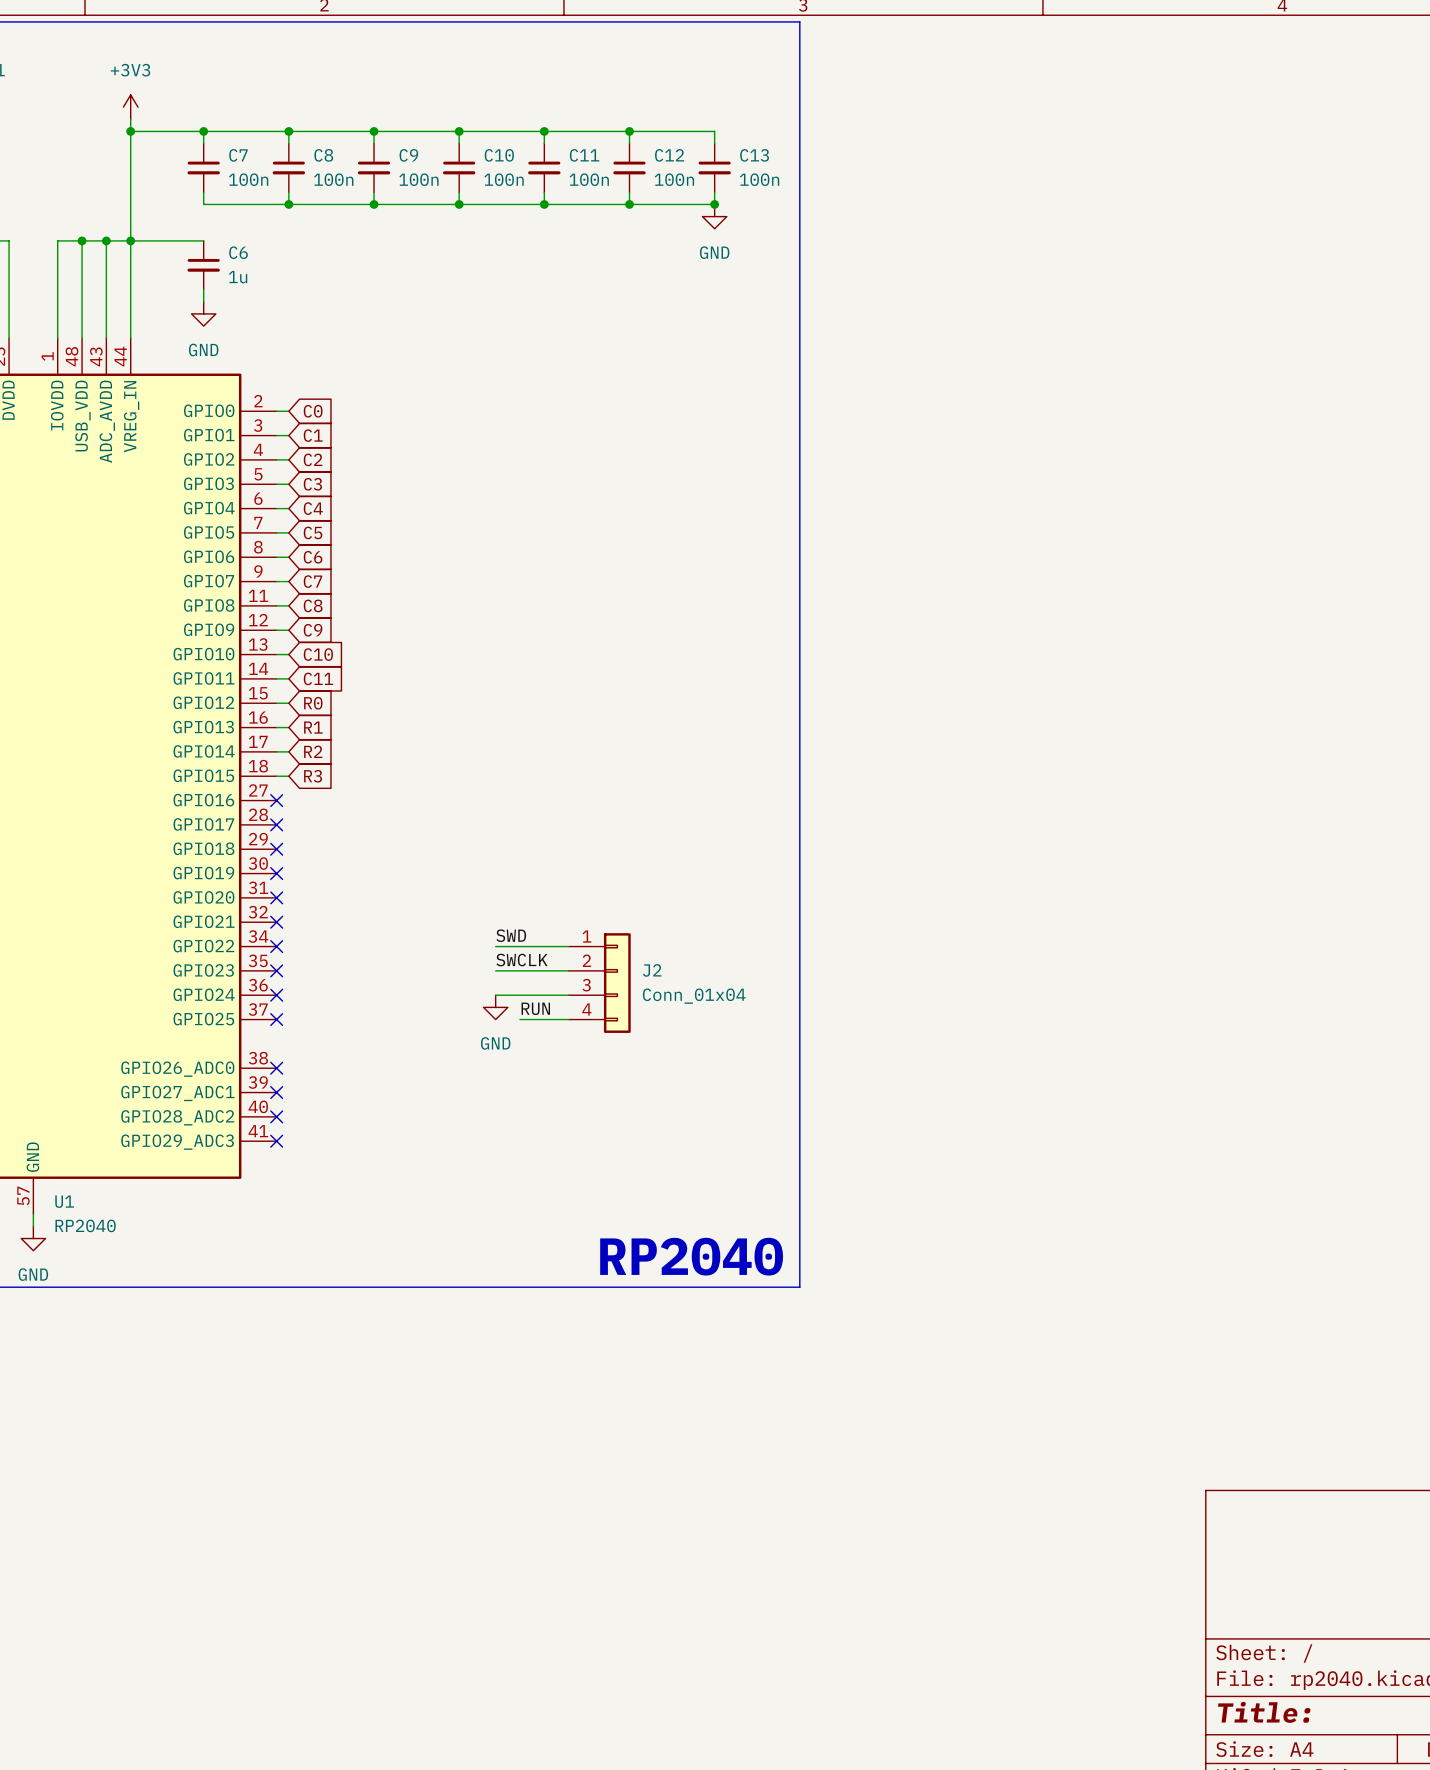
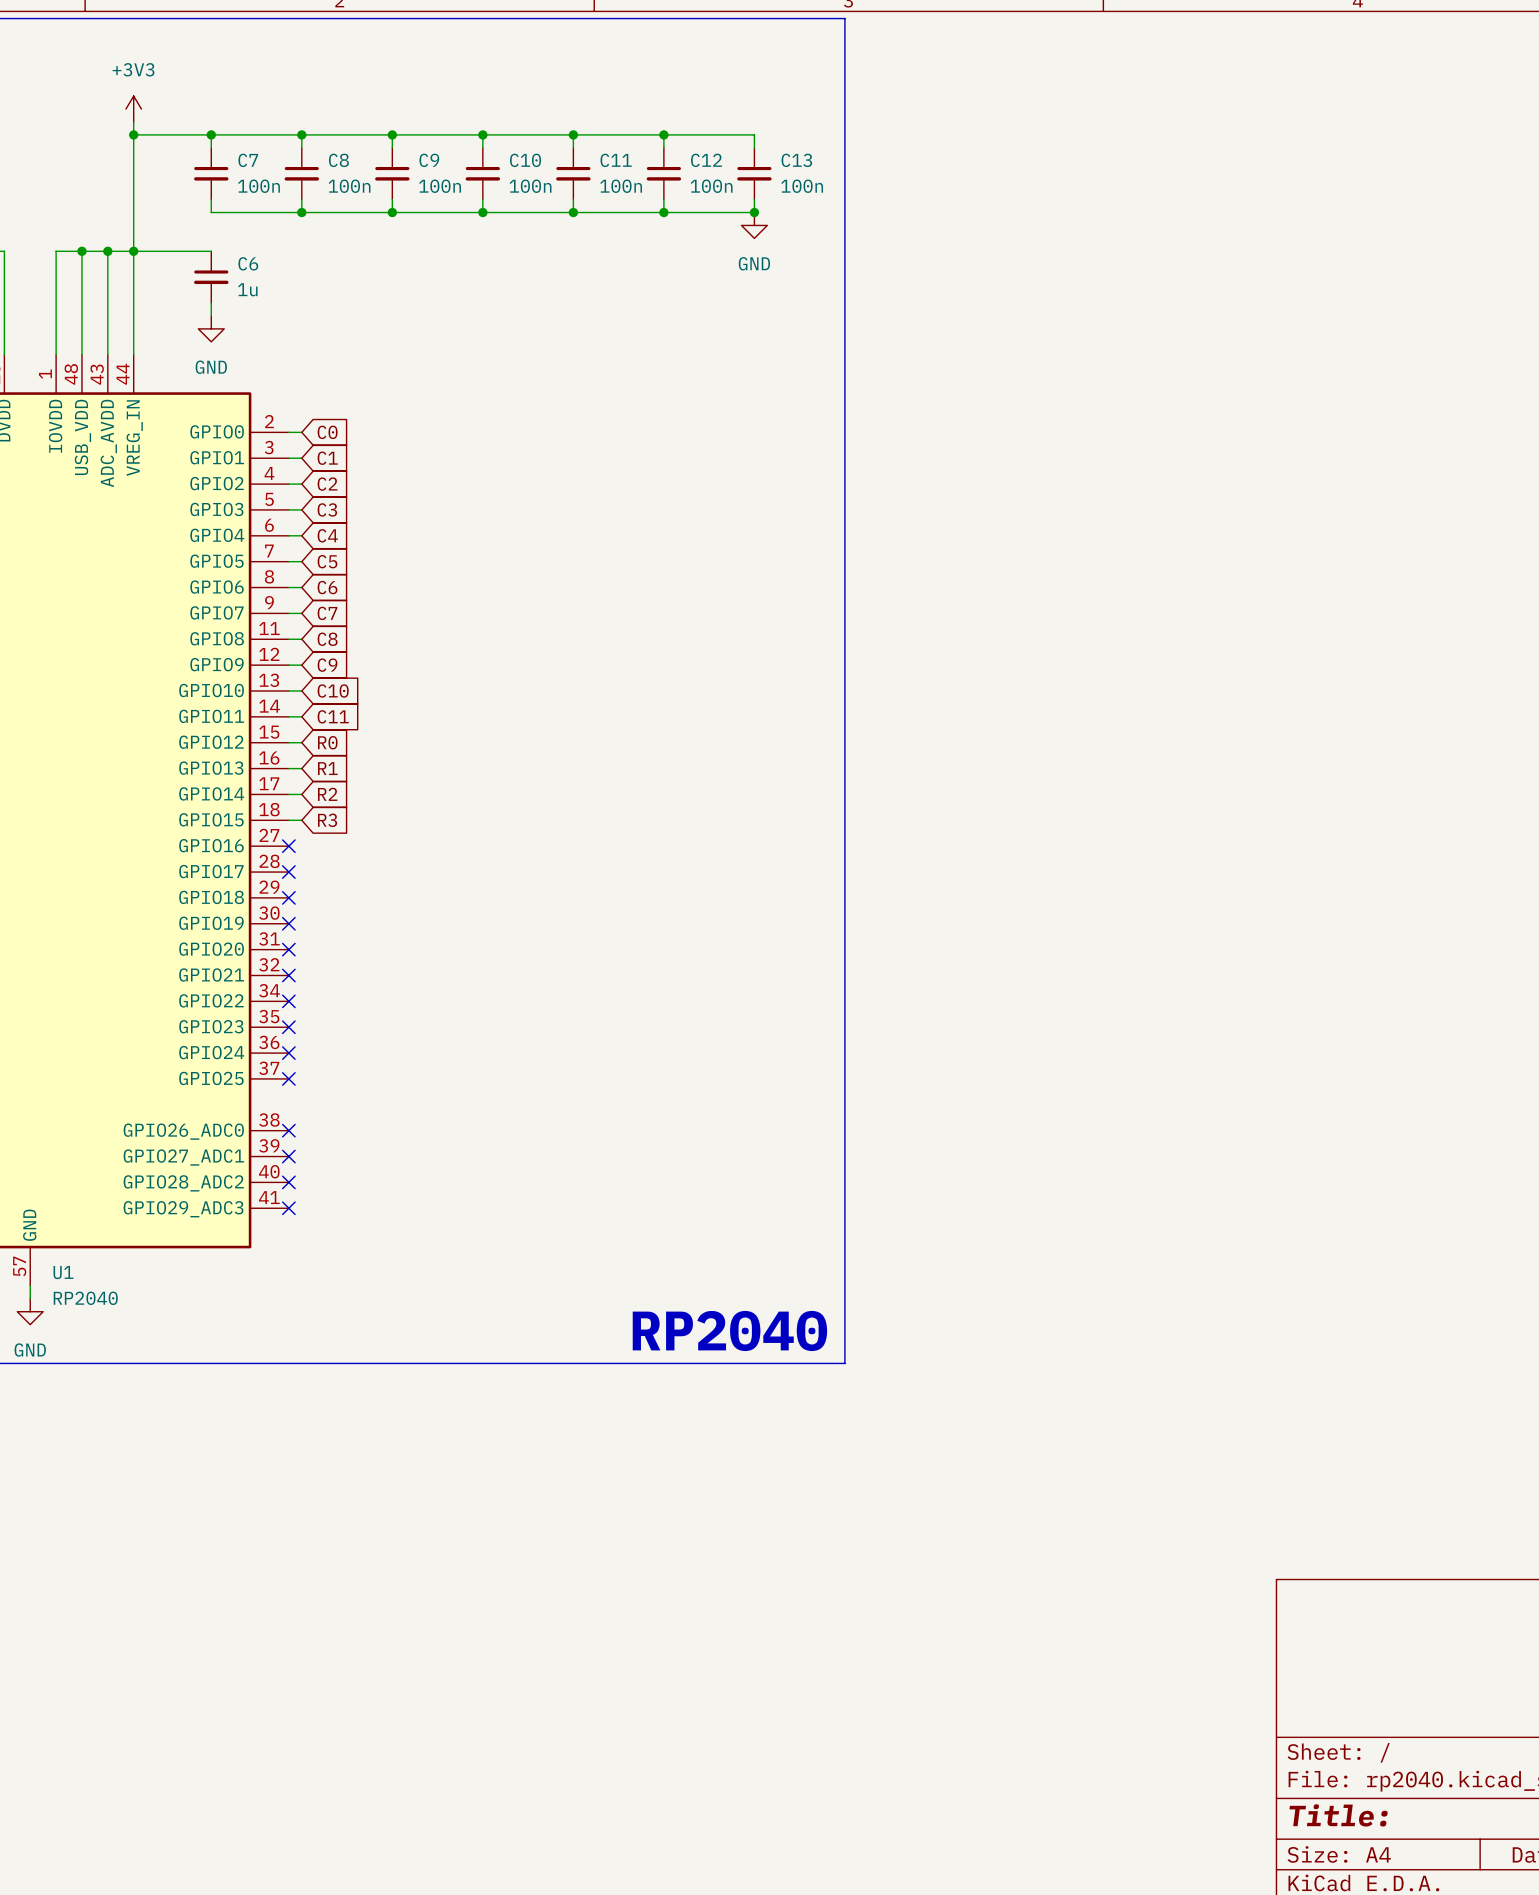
label: SWD (511, 935) -> none
wire: (495, 946) (568, 946) -> none
label: SWCLK (522, 960) -> none
wire: (495, 970) (568, 970) -> none
J2: Conn_01x04 (599, 983) -> none
wire: (495, 995) (568, 995) -> none
power symbol: GND (495, 1007) -> none
label: RUN (535, 1008) -> none
wire: (520, 1019) (568, 1019) -> none

